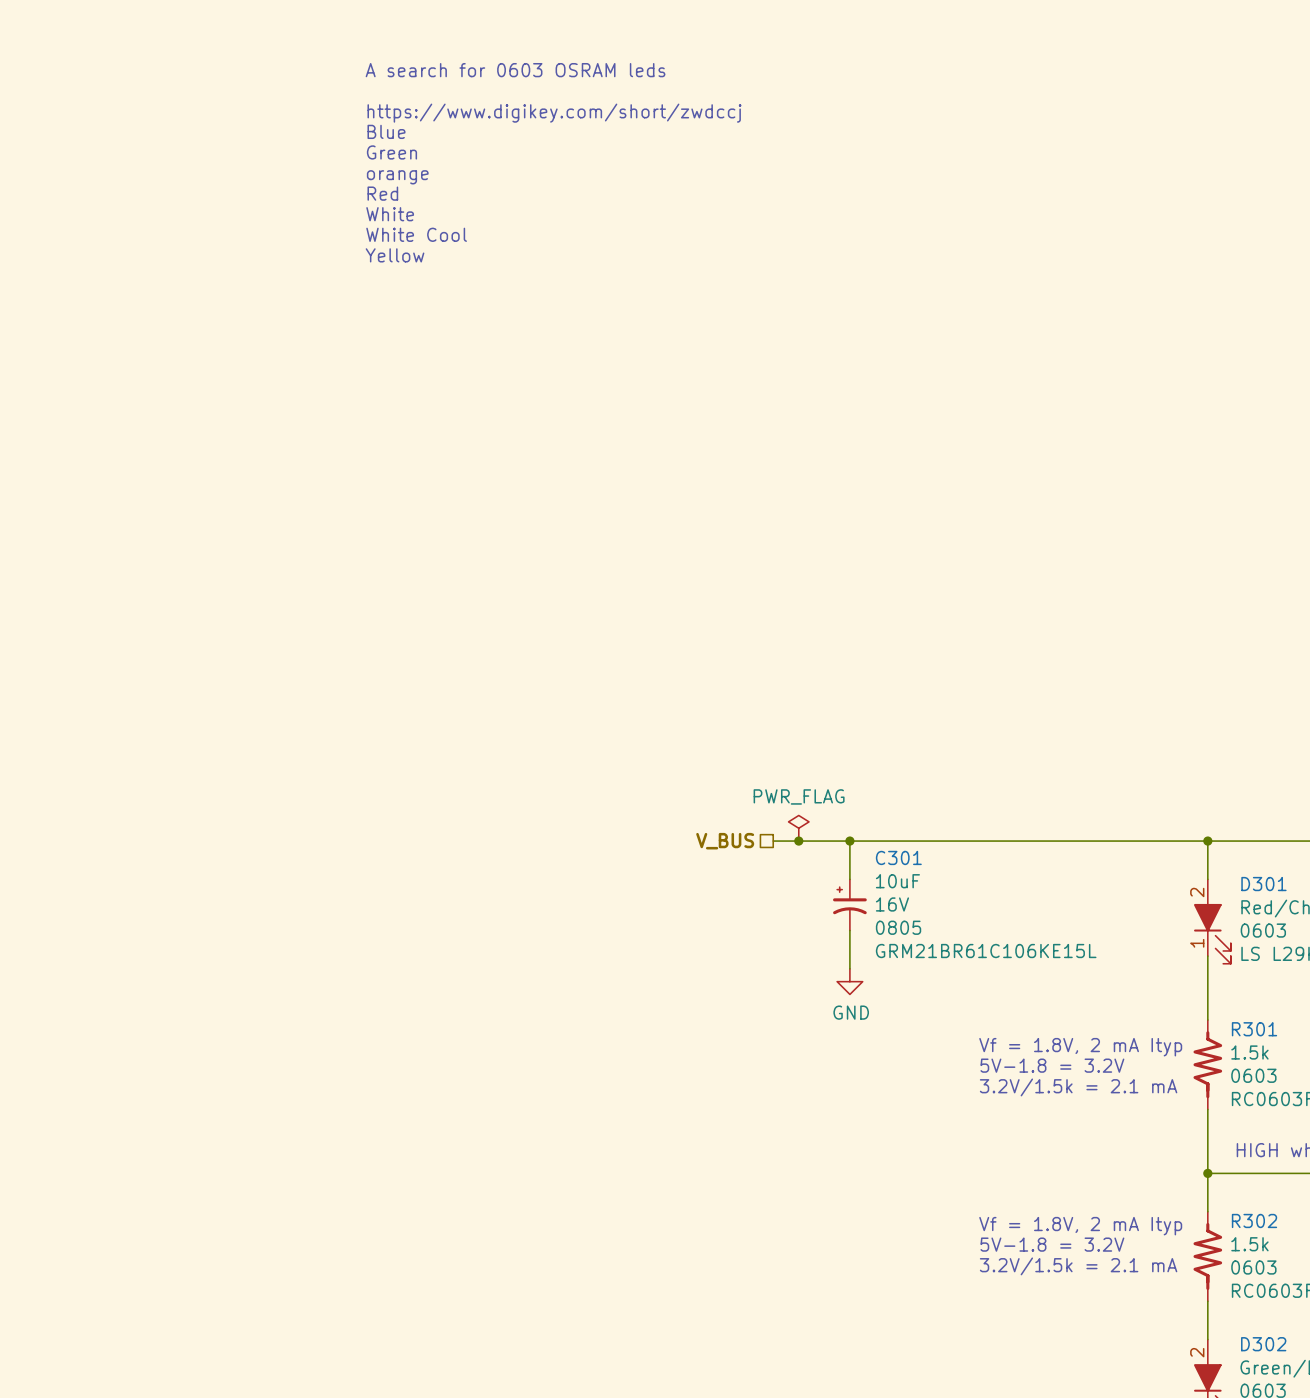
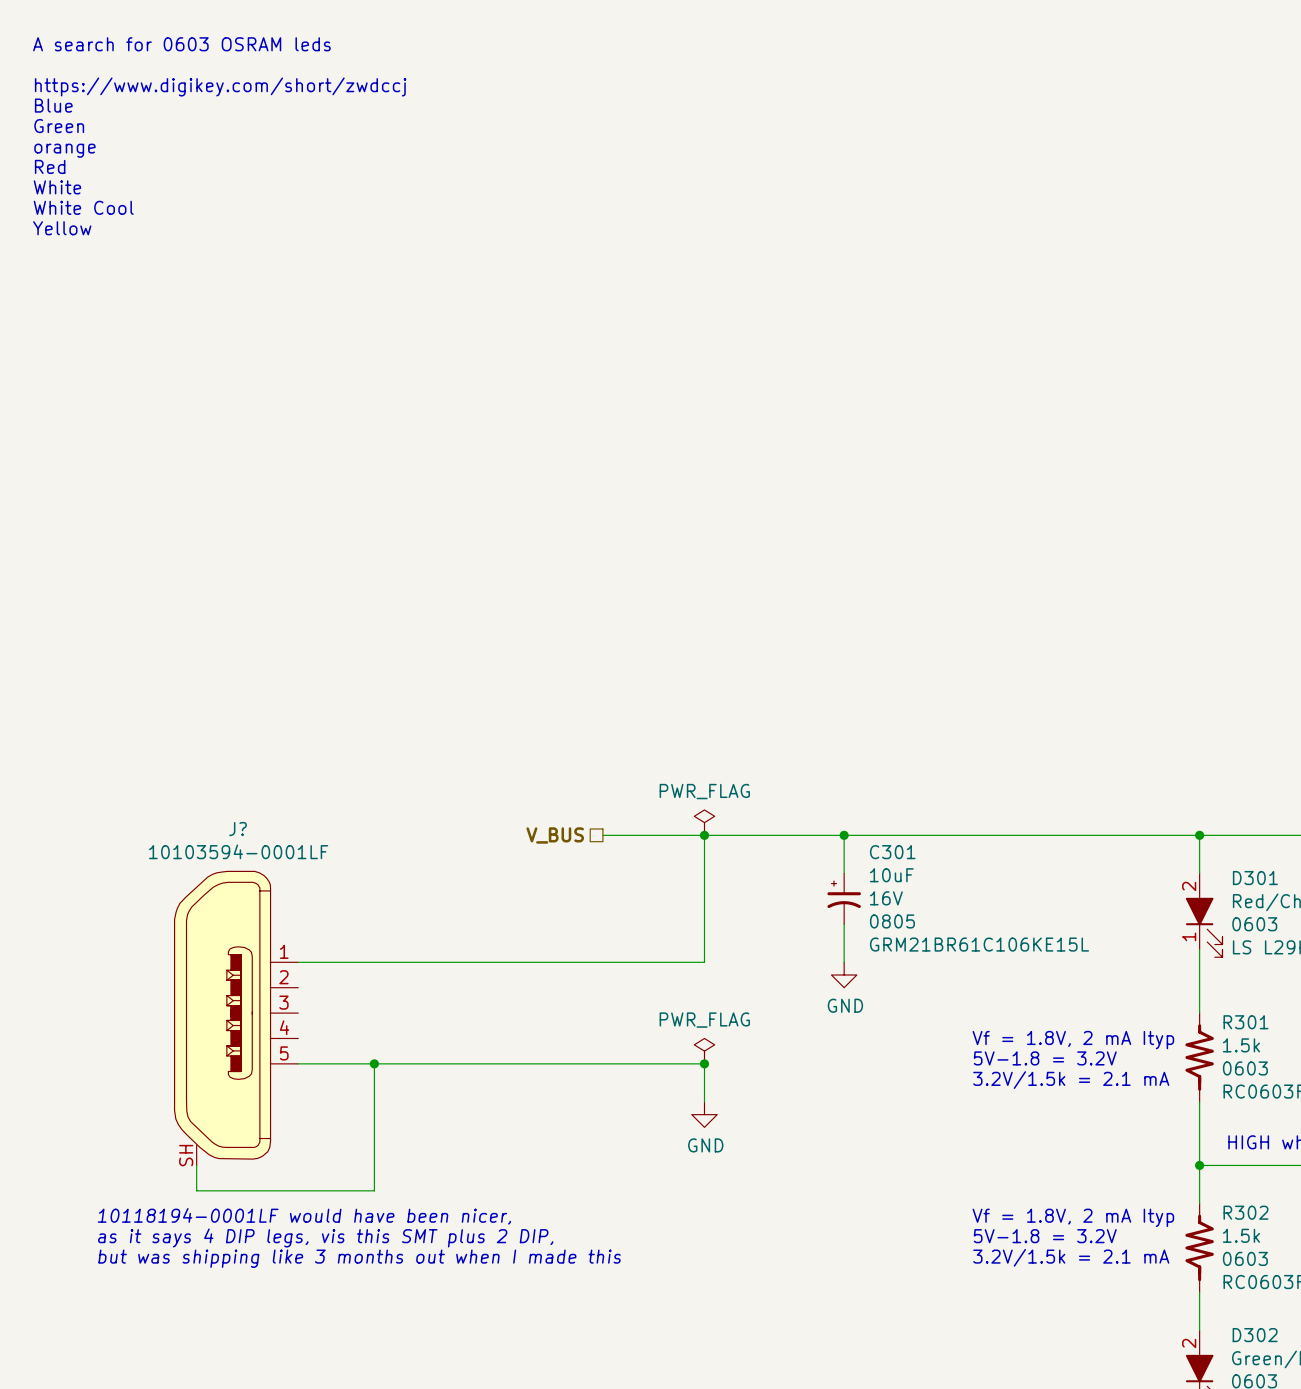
text: none -> A search for 0603 OSRAM leds (181, 44)
text: A search for 0603 OSRAM leds (515, 70) -> none
text: none -> https://www.digikey.com/short/zwdccj (220, 86)
text: none -> Blue (53, 105)
text: https://www.digikey.com/short/zwdccj (554, 113) -> none
text: none -> Green (59, 126)
text: Blue (386, 131) -> none
text: none -> orange (64, 150)
text: Green (391, 152) -> none
text: none -> Red (50, 166)
text: orange (397, 177) -> none
text: none -> White (57, 187)
text: Red (382, 193) -> none
text: none -> White Cool (83, 207)
text: White (390, 214) -> none
text: none -> Yellow (62, 228)
text: White Cool (416, 234) -> none
text: Yellow (395, 255) -> none
power symbol position: PWR_FLAG (798, 828) -> PWR_FLAG (704, 822)
wire: none -> (602, 835) (767, 835)
wire: none -> (704, 835) (704, 962) (298, 962)
junction: none -> (704, 835)
hierarchical label position: V_BUS (725, 841) -> V_BUS (555, 835)
junction: (798, 841) -> none
J?: none -> 10103594-0001LF (236, 1018)
power symbol: none -> PWR_FLAG (704, 1051)
wire: none -> (298, 1063) (704, 1063) (704, 1101)
wire: none -> (374, 1063) (374, 1190) (196, 1190) (196, 1165)
junction: none -> (374, 1063)
junction: none -> (704, 1063)
power symbol: none -> GND (704, 1114)
text: none -> 10118194-0001LF would have been nicer, (304, 1216)
text: none -> as it says 4 DIP legs, vis this SMT plus 2 DIP, (325, 1237)
text: none -> but was shipping like 3 months out when I made this (359, 1258)

